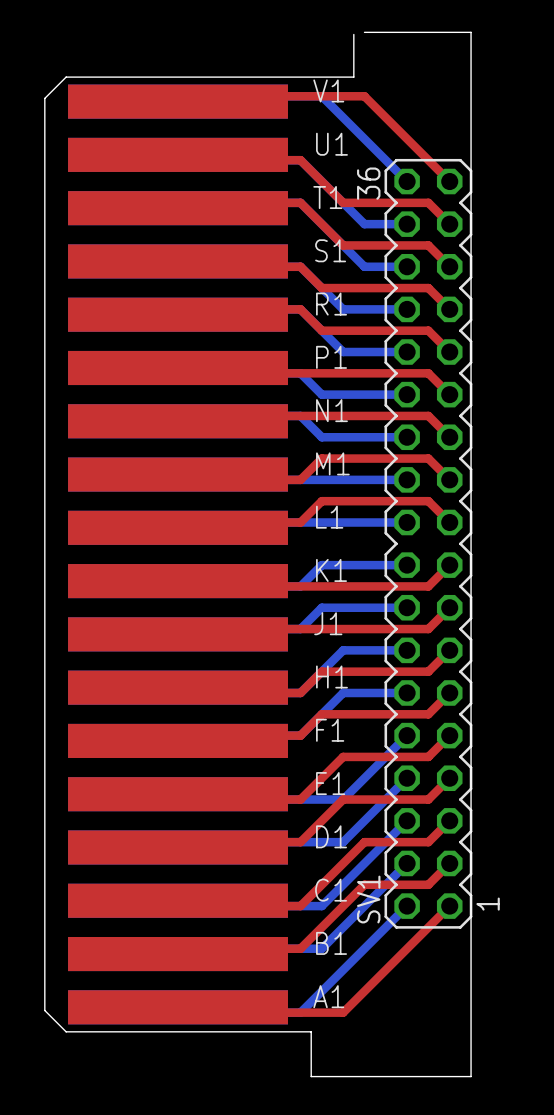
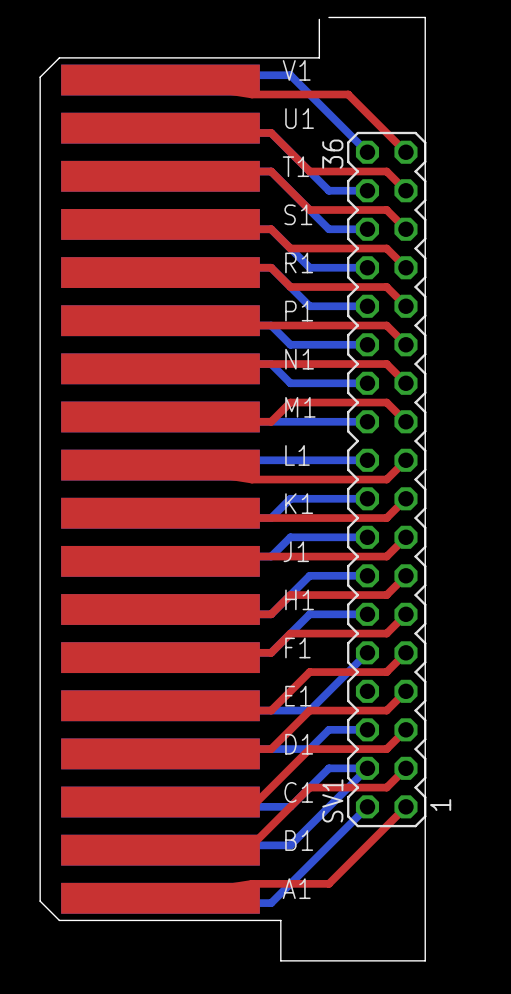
top track: (178, 101) (194, 96) (364, 96) (385, 117) -> (160, 80) (251, 94) (348, 94)
top track: (449, 522) (428, 501) (321, 501) (300, 522) (194, 522) (178, 527) -> (405, 460) (386, 479) (251, 479) (160, 465)
bottom track: (407, 778) (364, 820) -> (367, 729) (328, 729)
bottom track: (407, 820) (364, 863) -> (367, 768) (328, 768)
top track: (364, 842) (300, 906) (194, 906) (178, 900) -> (328, 749) (309, 749) (251, 806) (160, 802)
top track: (364, 884) (300, 948) (194, 948) (178, 954) -> (328, 787) (309, 787) (251, 845) (160, 850)
top track: (364, 991) (343, 1012) (194, 1012) (178, 1007) -> (328, 883) (251, 883) (160, 898)

